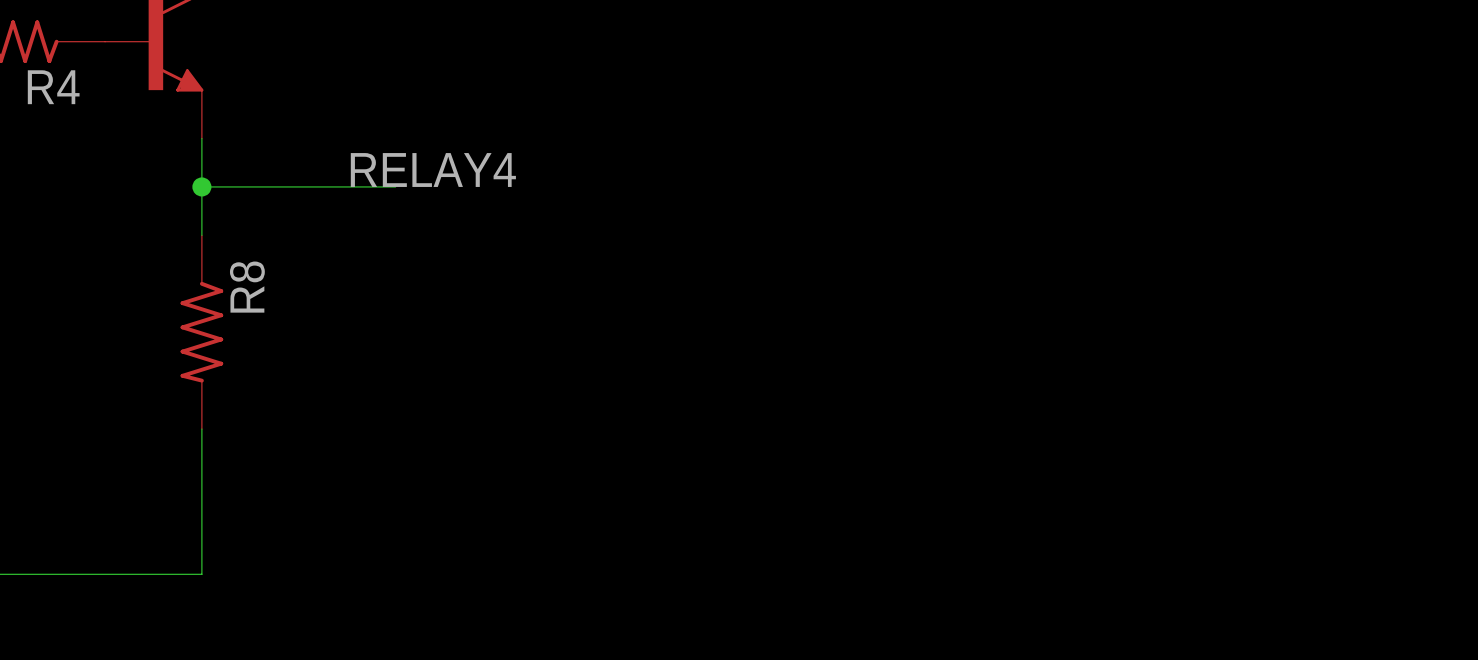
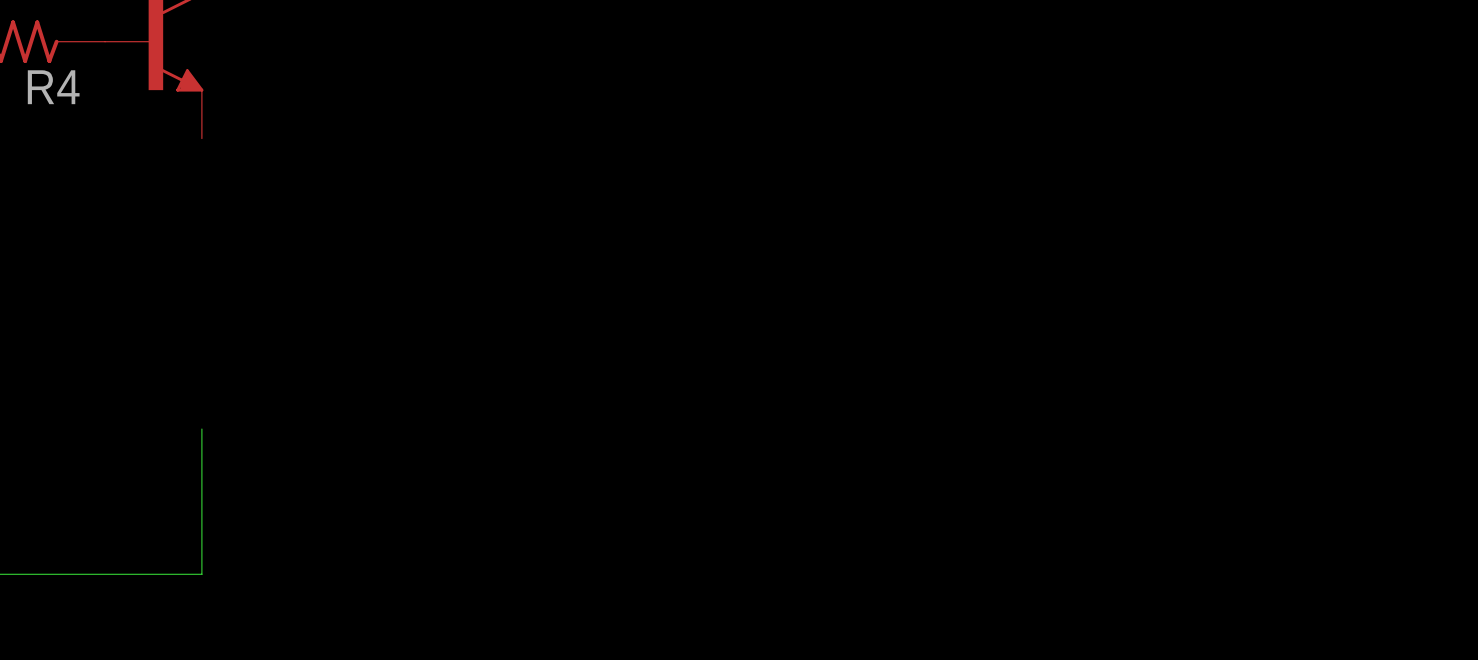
wire: (201, 138) (201, 235) -> none
label: RELAY4 (433, 170) -> none
wire: (201, 186) (395, 186) -> none
junction: (201, 186) -> none
R8: (201, 332) -> none

